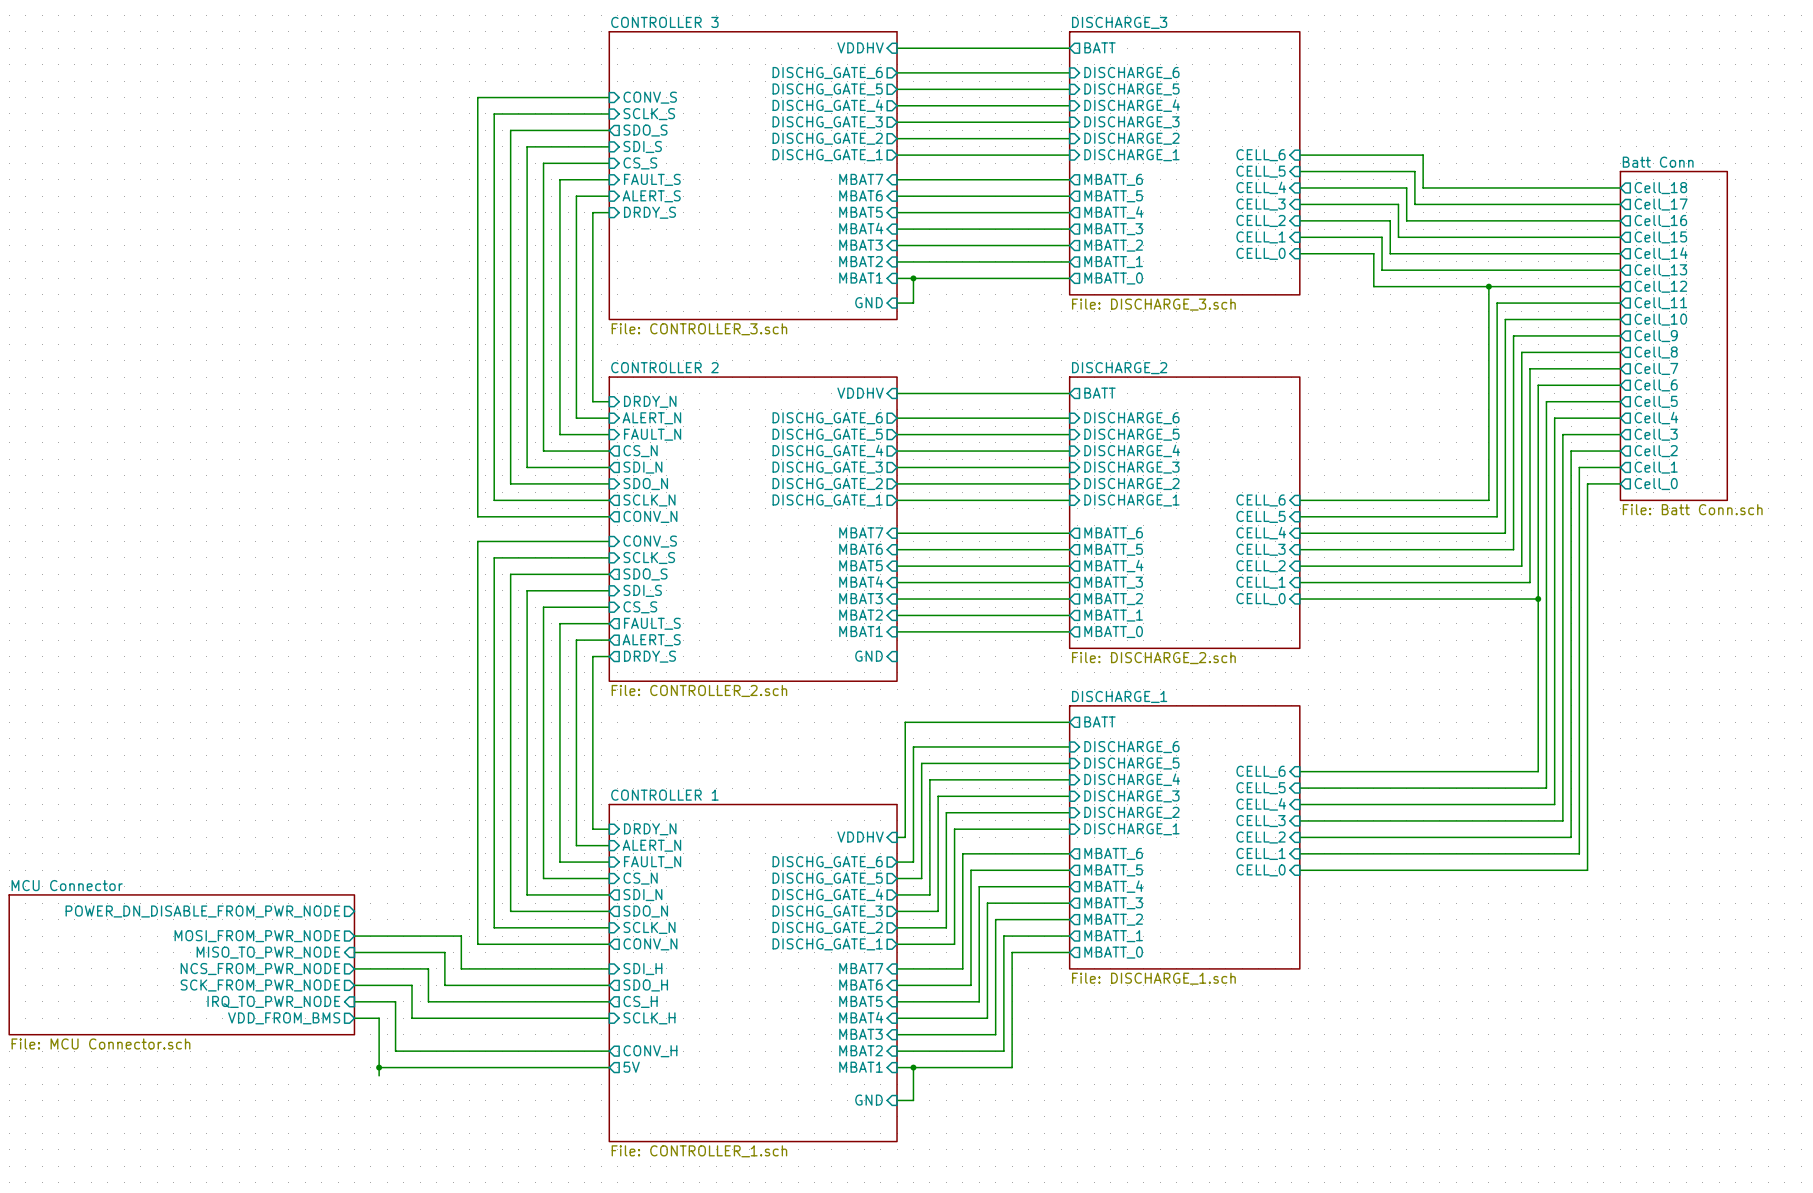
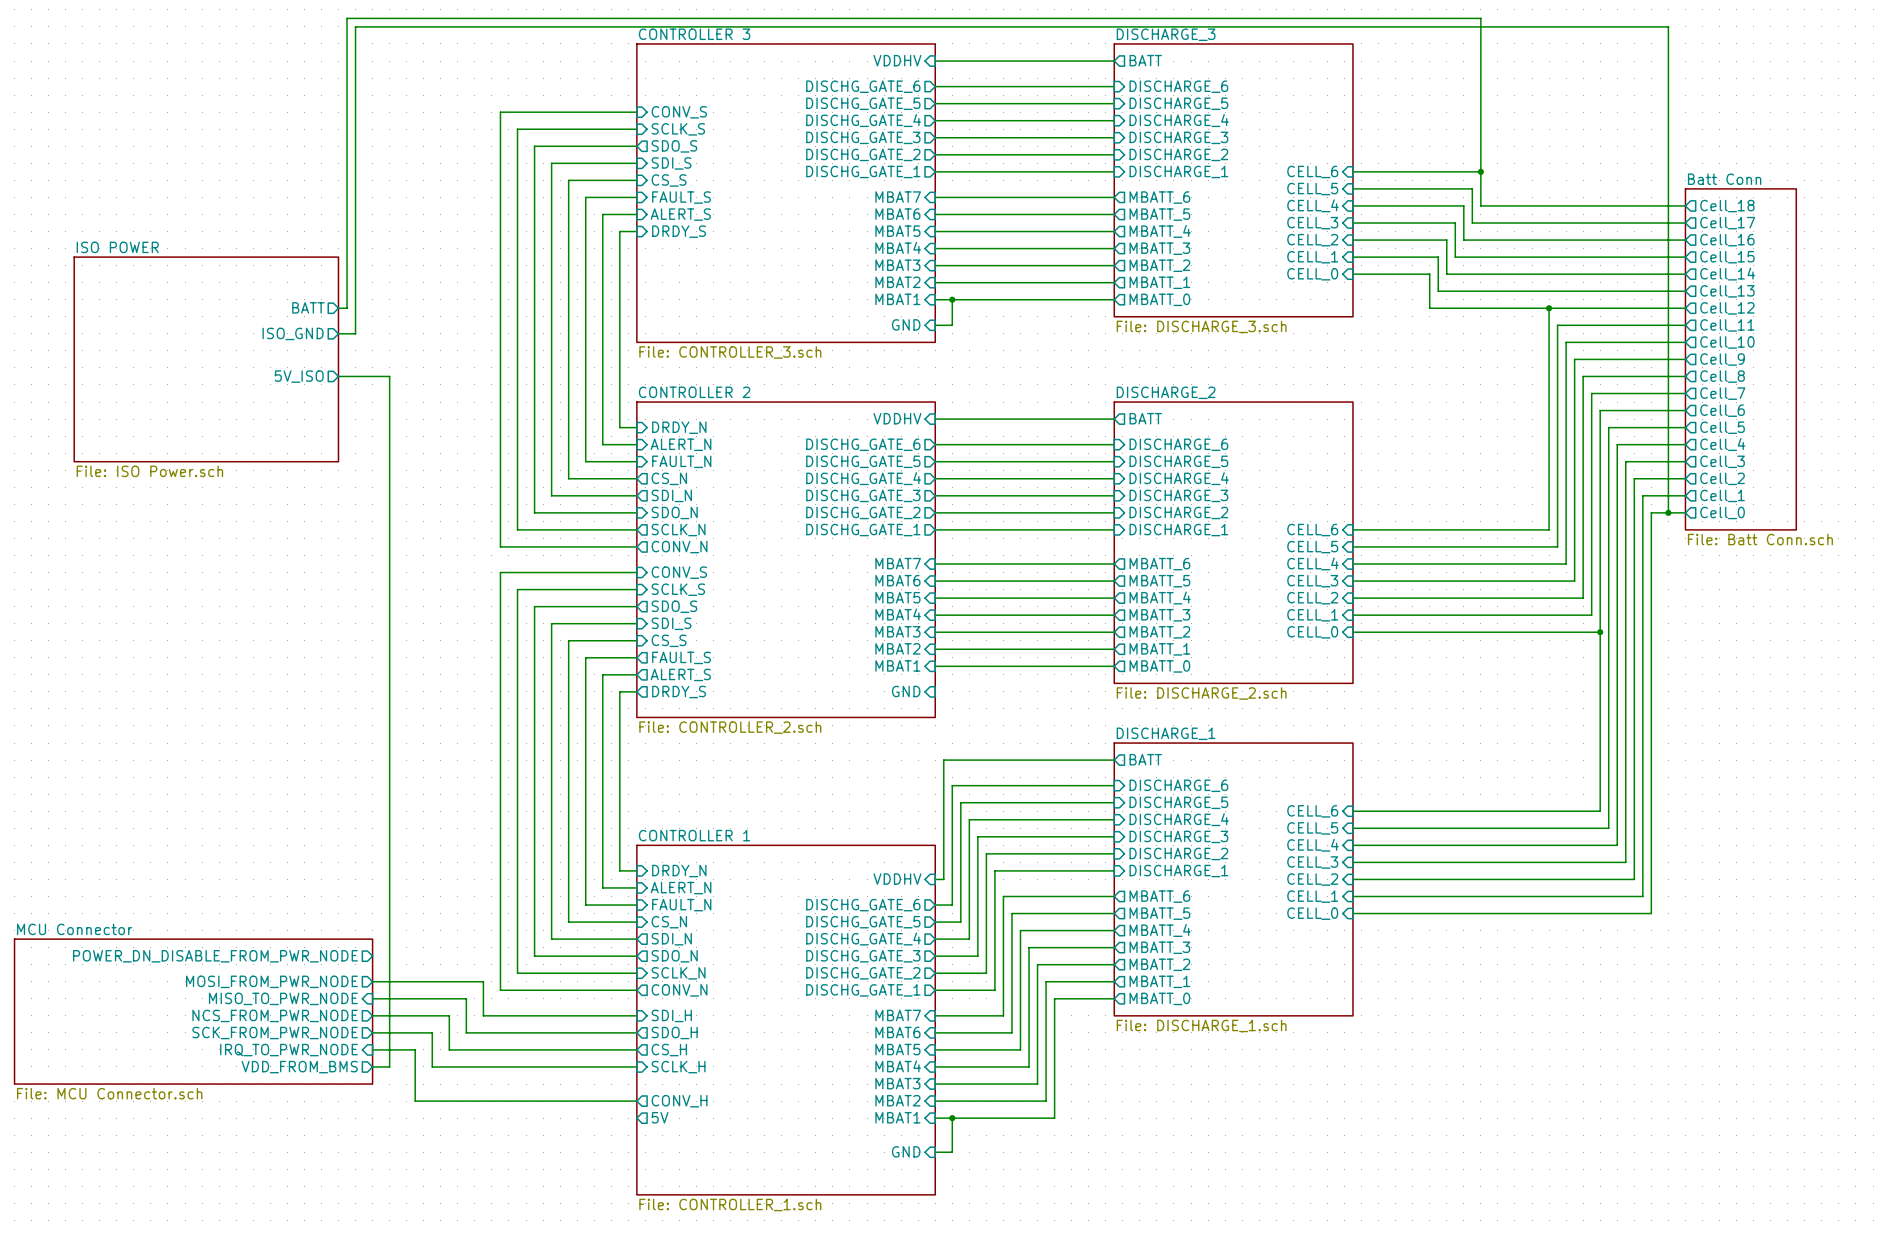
wire: none -> (1480, 171) (1480, 18) (347, 18) (347, 308) (338, 308)
junction: none -> (1480, 171)
sheet pin: none -> BATT (308, 307)
sheet pin: none -> ISO_GND (293, 333)
wire: none -> (338, 333) (355, 333) (355, 26) (1668, 26) (1668, 512)
sheet ISO POWER: none -> File: ISO Power.sch (206, 359)
sheet pin: none -> 5V_ISO (299, 376)
junction: none -> (1668, 512)
wire: (370, 1018) (379, 1018) (379, 1075) -> (389, 1066) (389, 376) (338, 376)
wire: (379, 1067) (609, 1067) -> none
junction: (379, 1067) -> none

